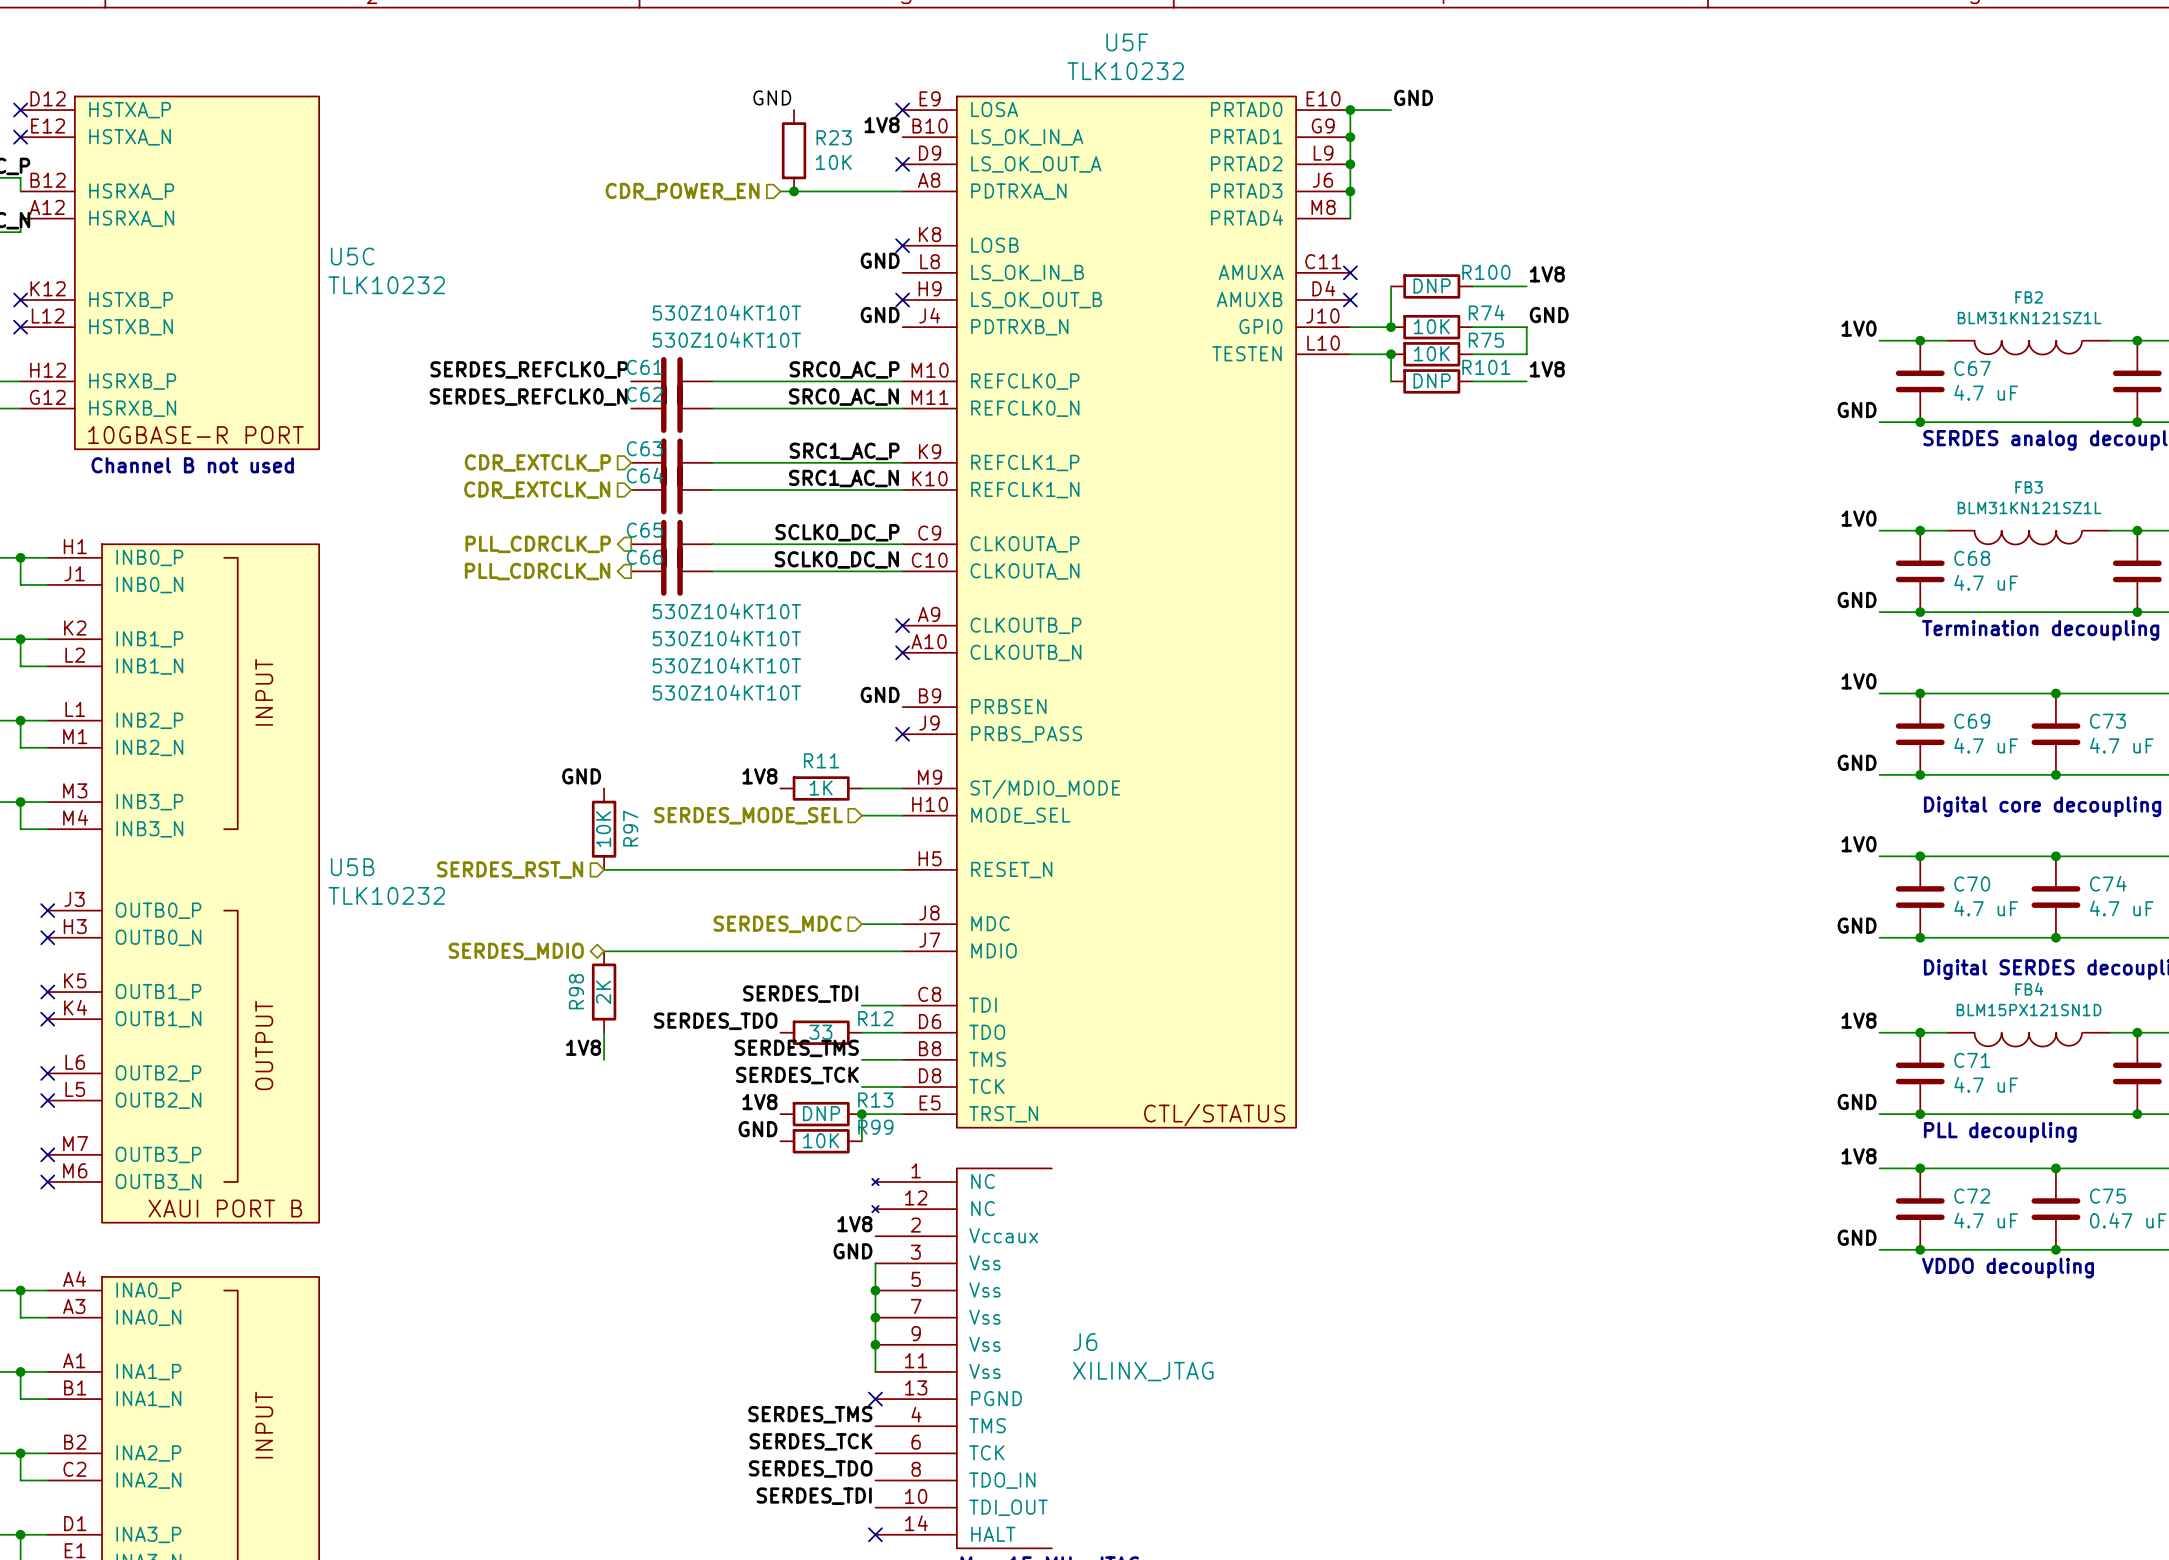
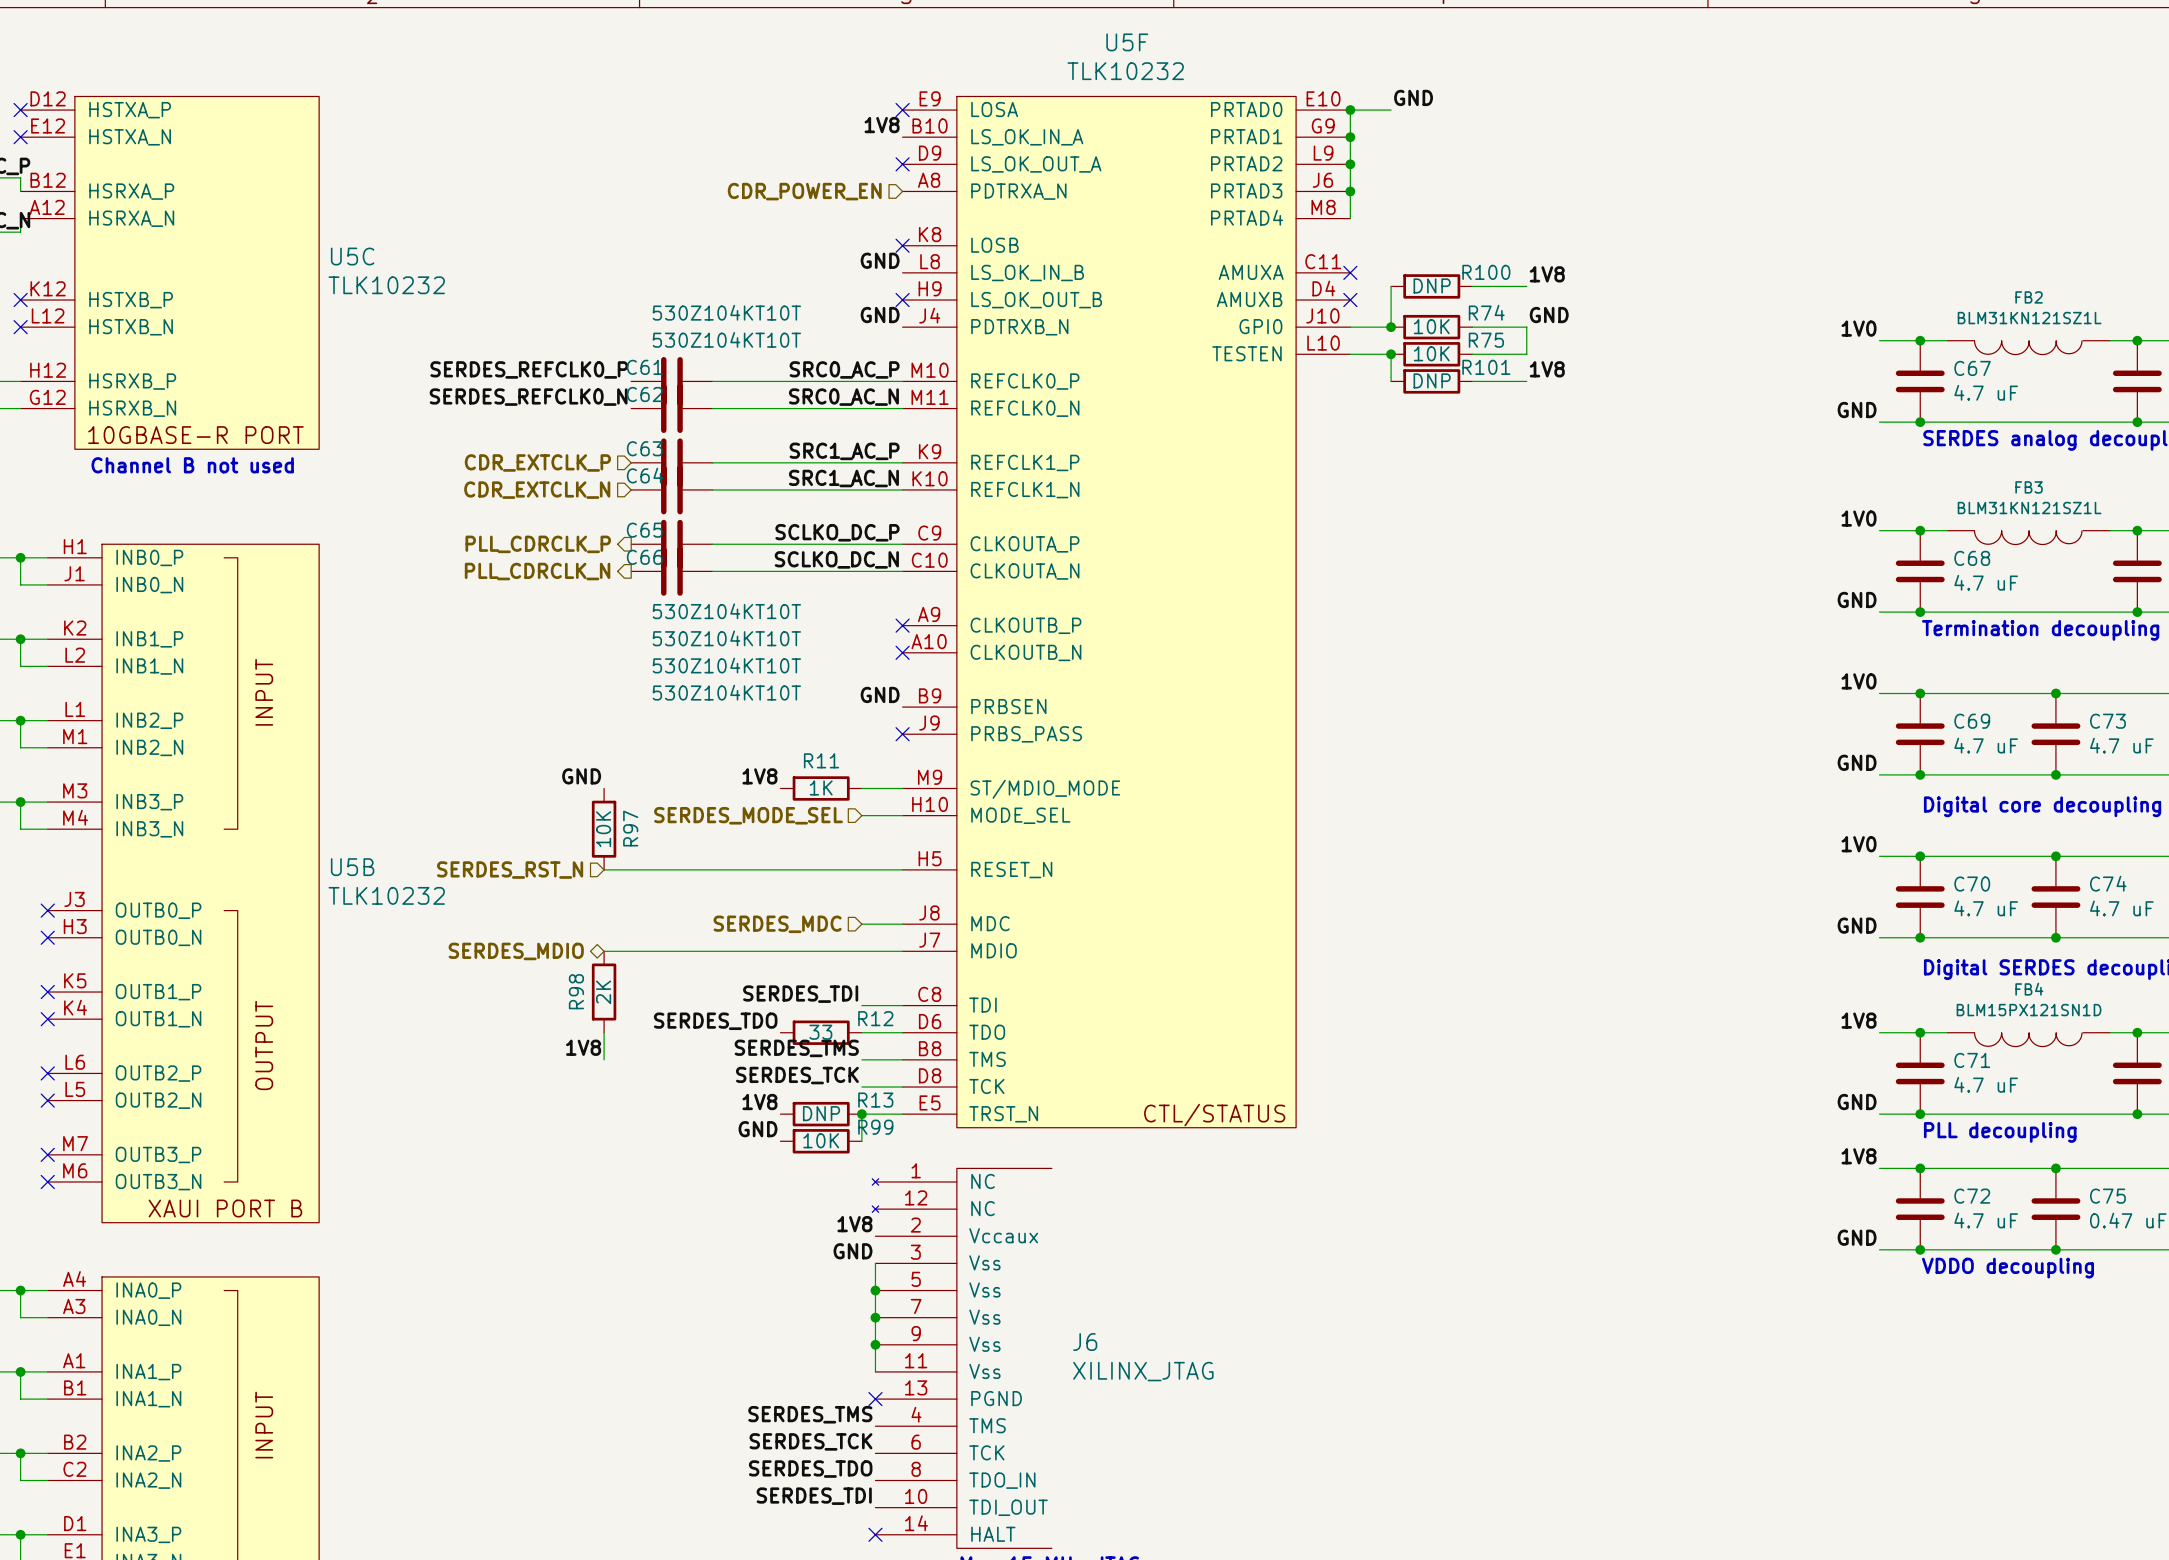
label: GND (772, 97) -> none
R23: 10K (794, 150) -> none
hierarchical label position: CDR_POWER_EN (682, 191) -> CDR_POWER_EN (804, 191)
wire: (780, 191) (902, 191) -> none
junction: (794, 191) -> none

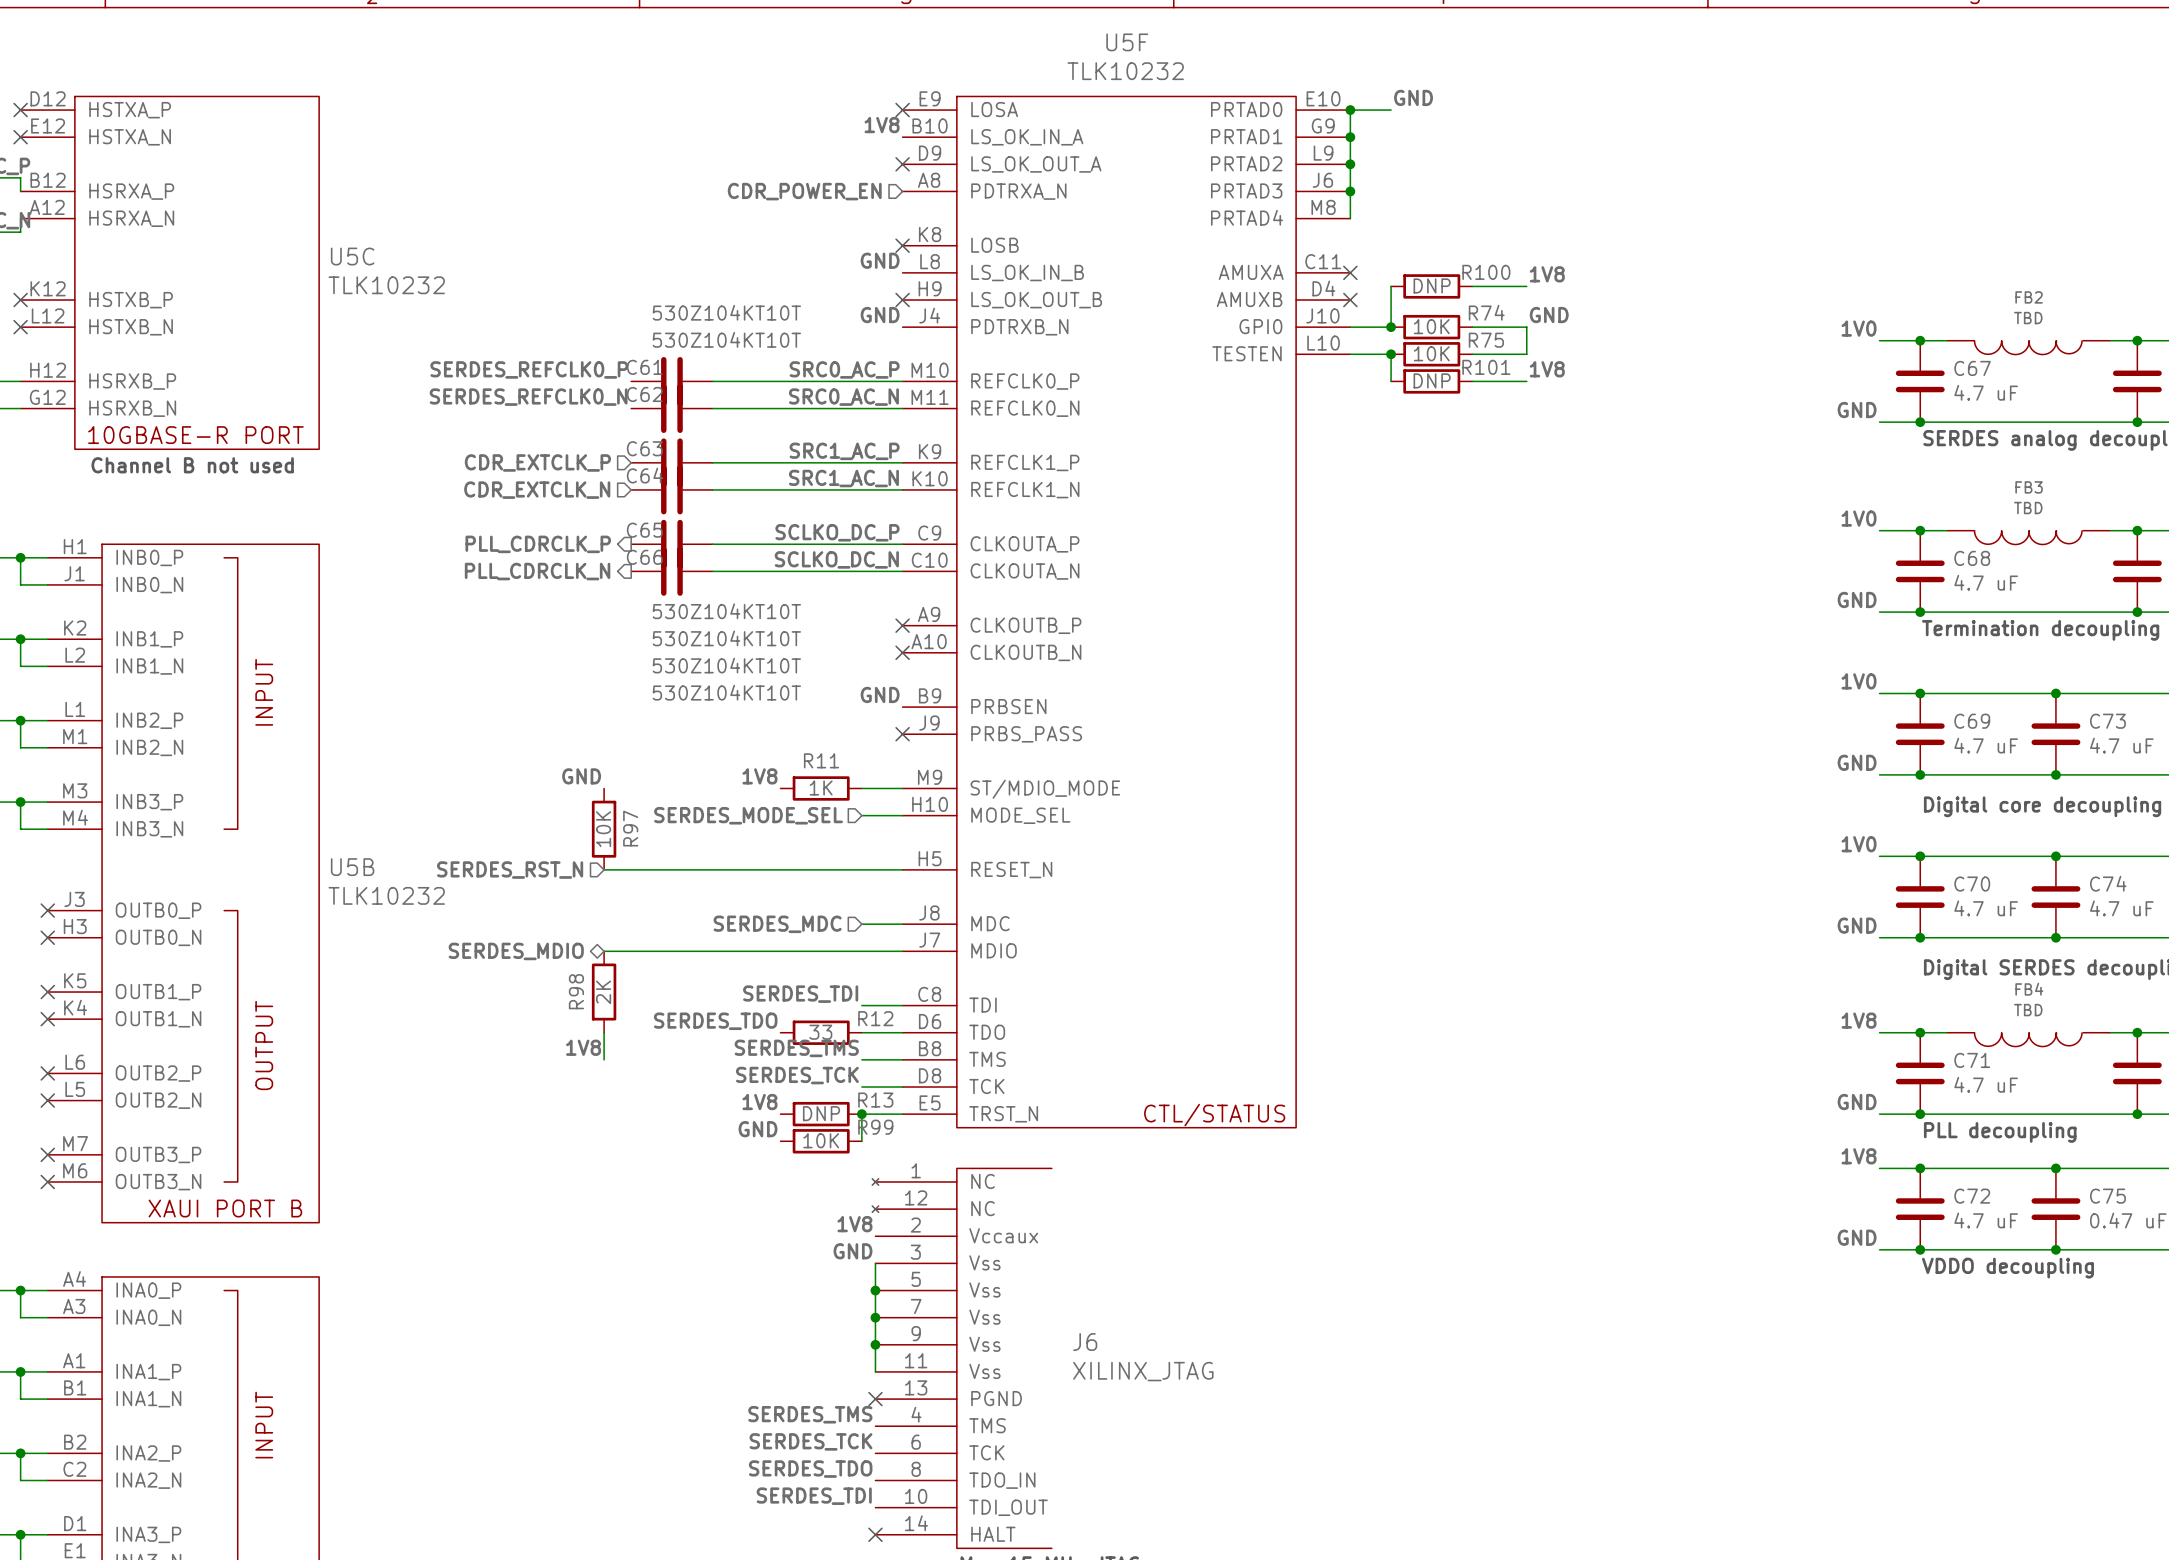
FB2 value: BLM31KN121SZ1L (2029, 318) -> TBD (2028, 318)
FB3 value: BLM31KN121SZ1L (2029, 508) -> TBD (2028, 508)
FB4 value: BLM15PX121SN1D (2029, 1010) -> TBD (2028, 1010)

